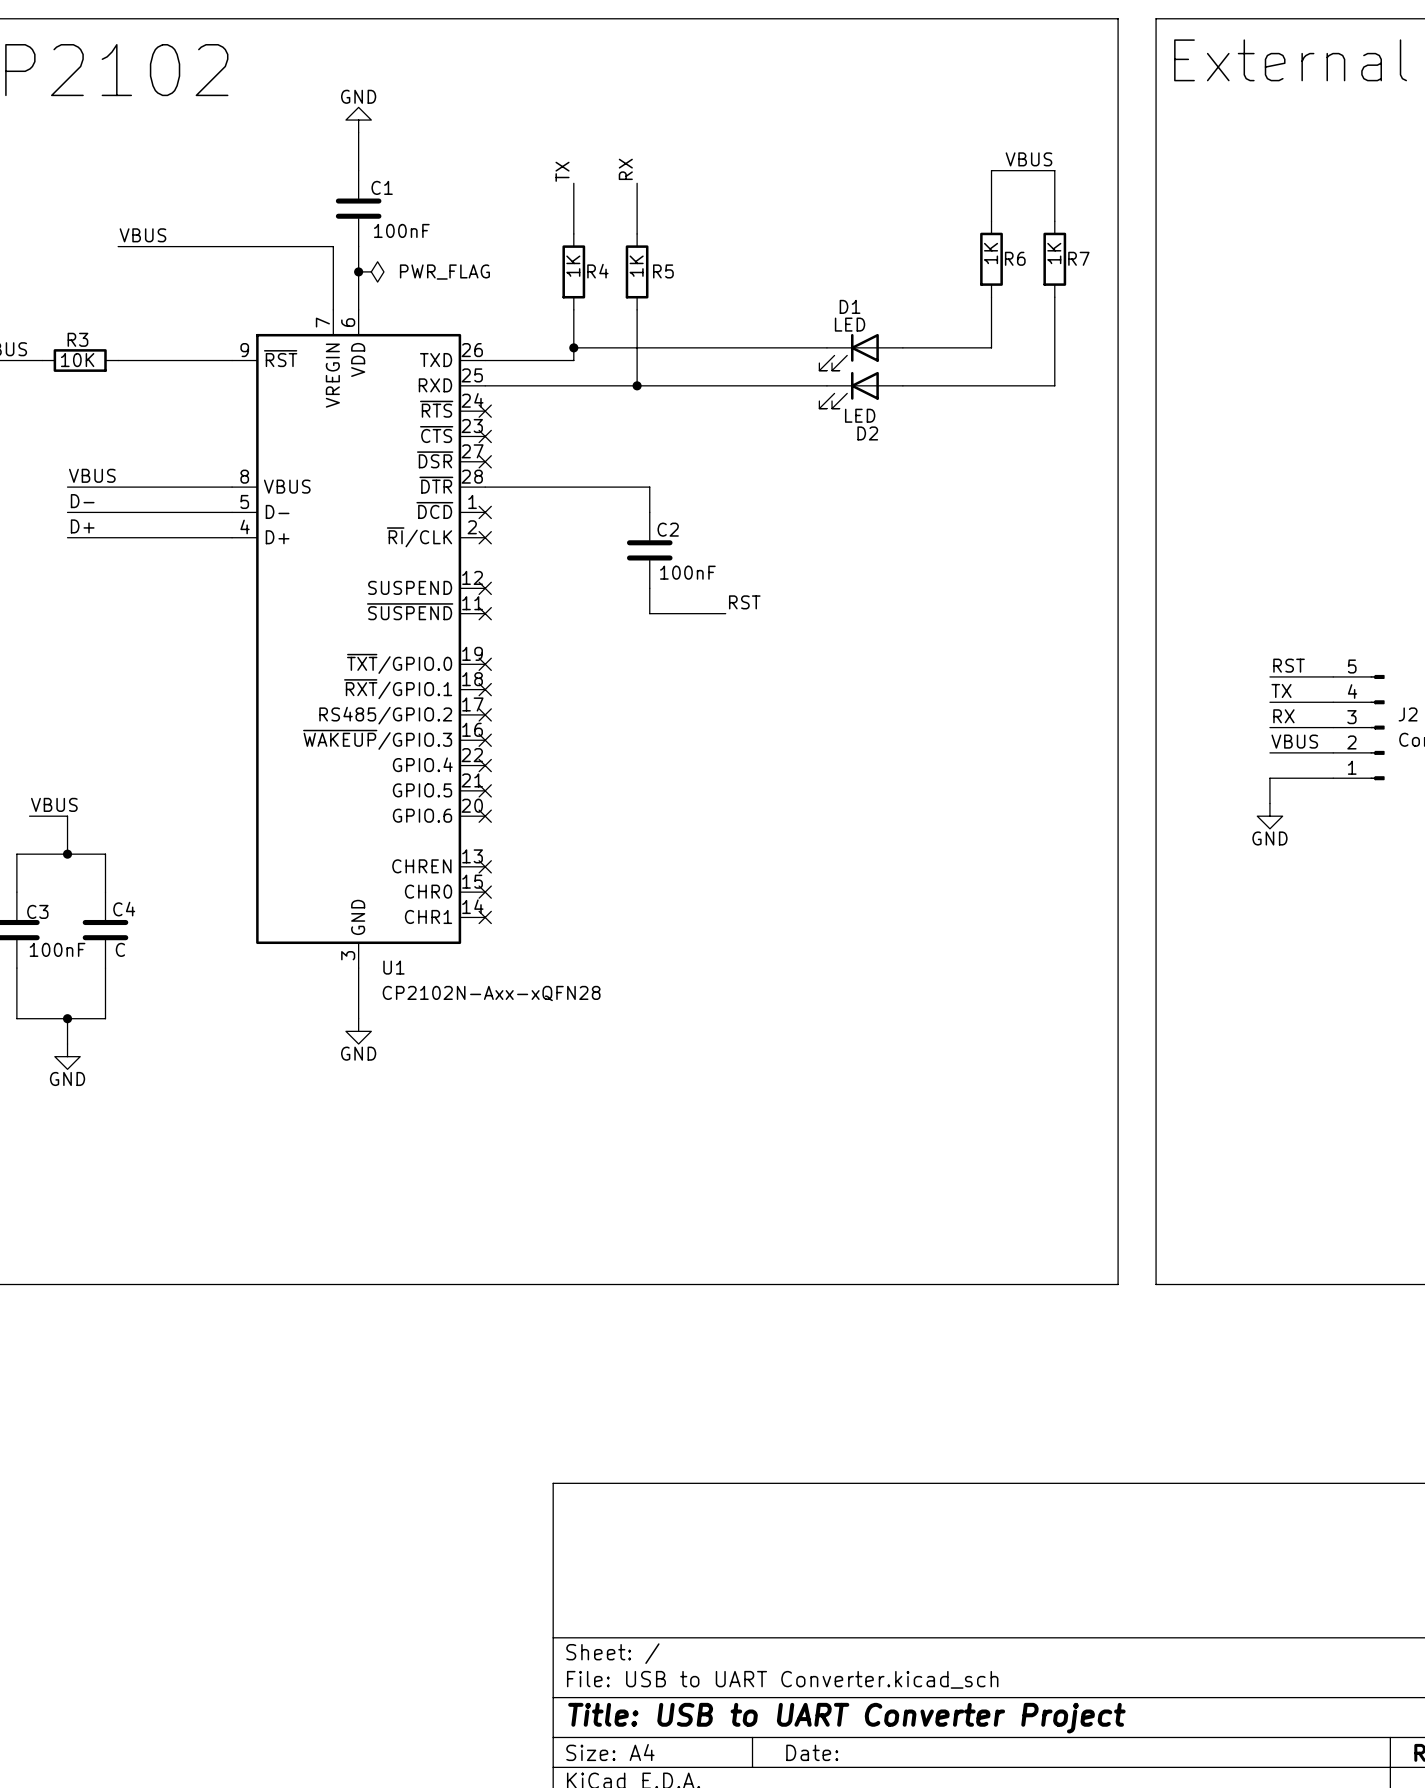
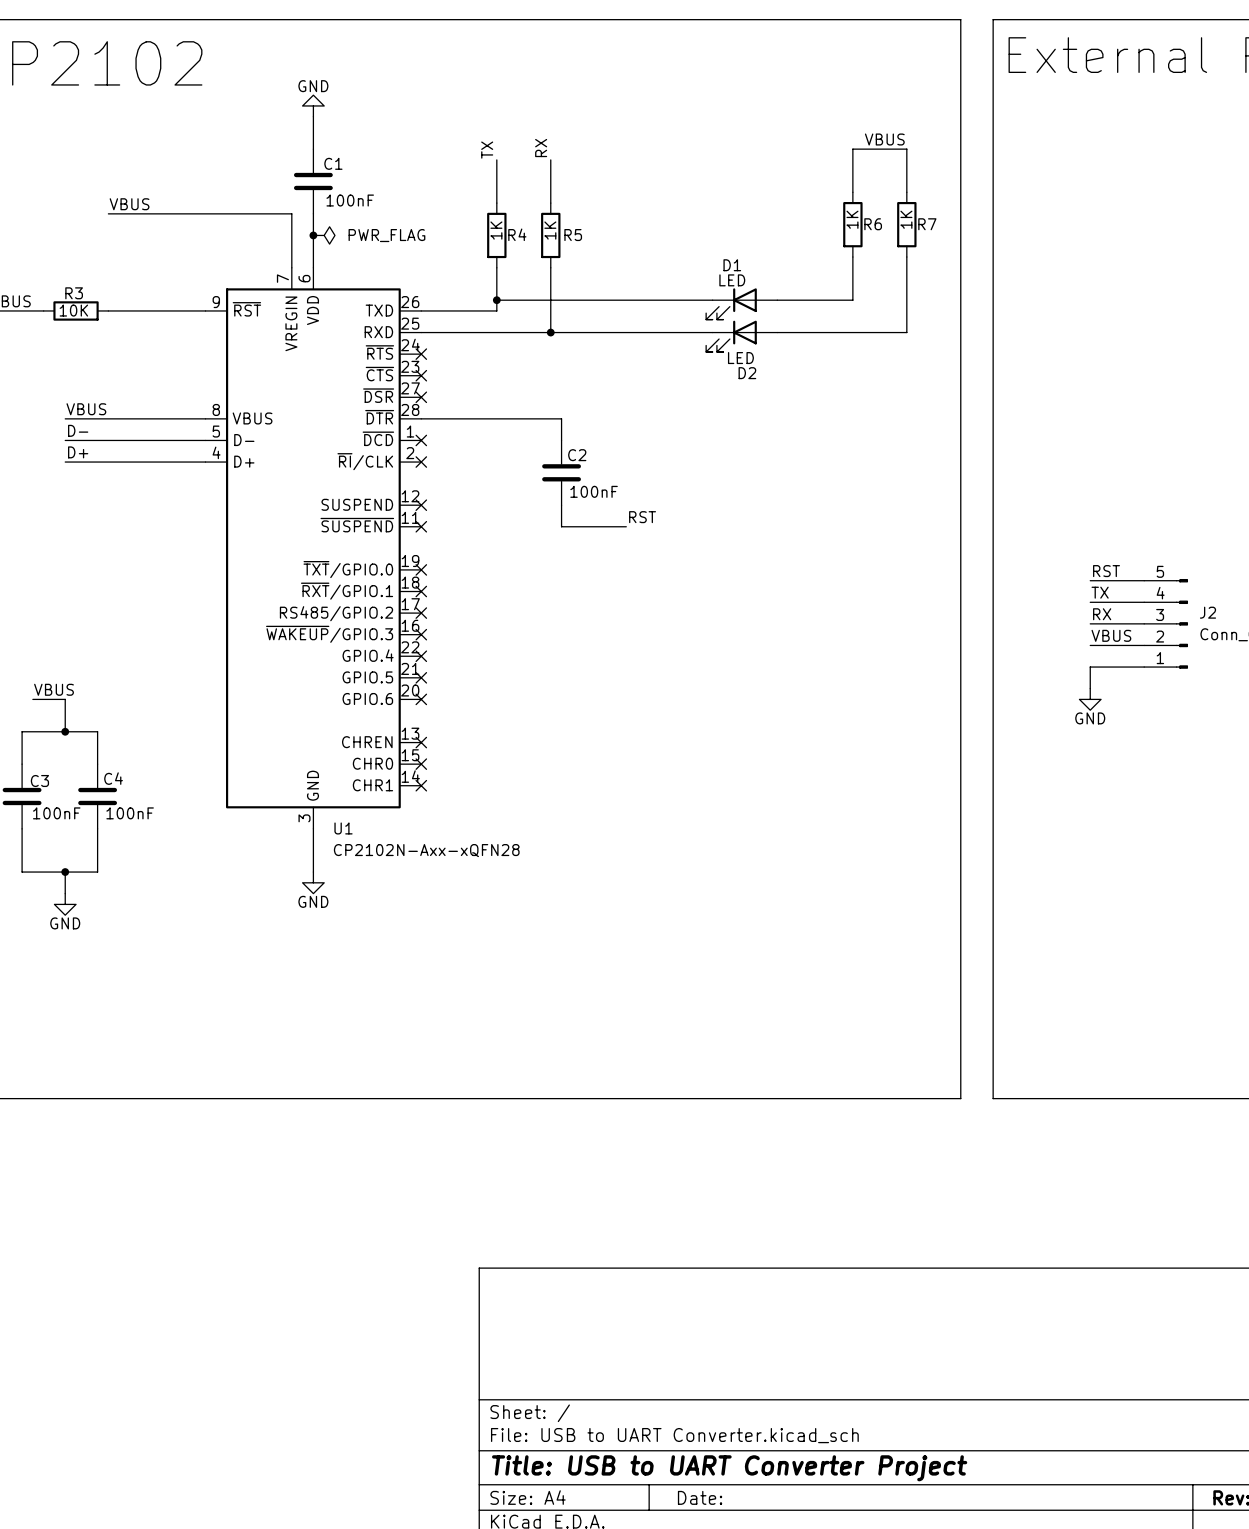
C4 value: C (120, 949) -> 100nF (130, 813)

